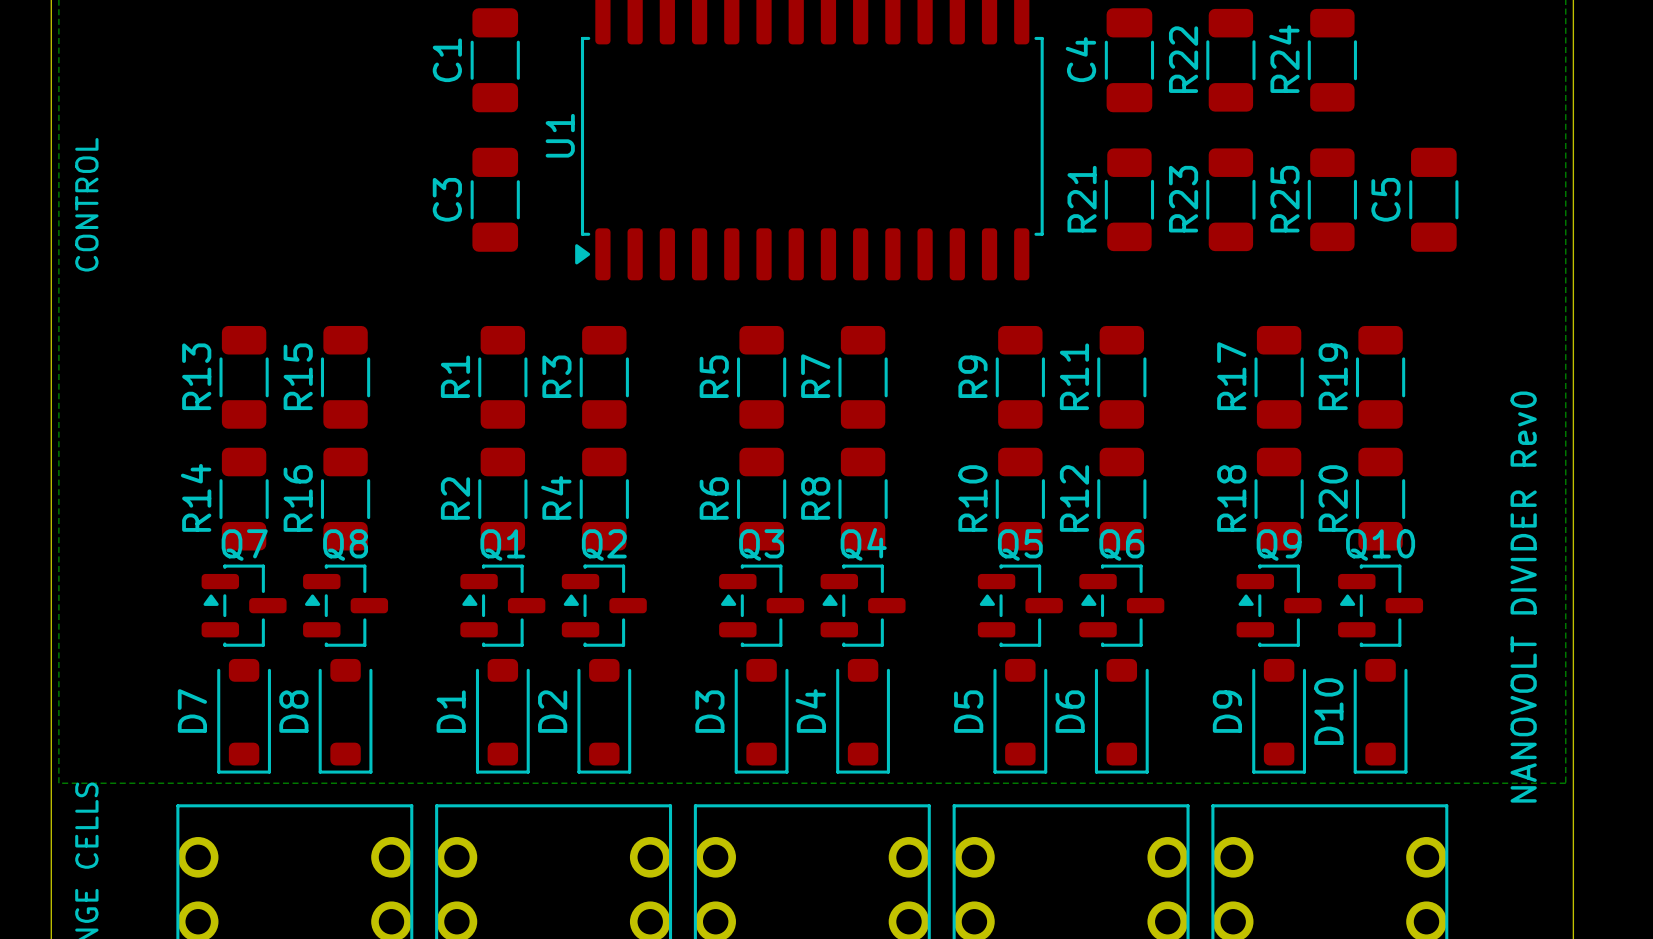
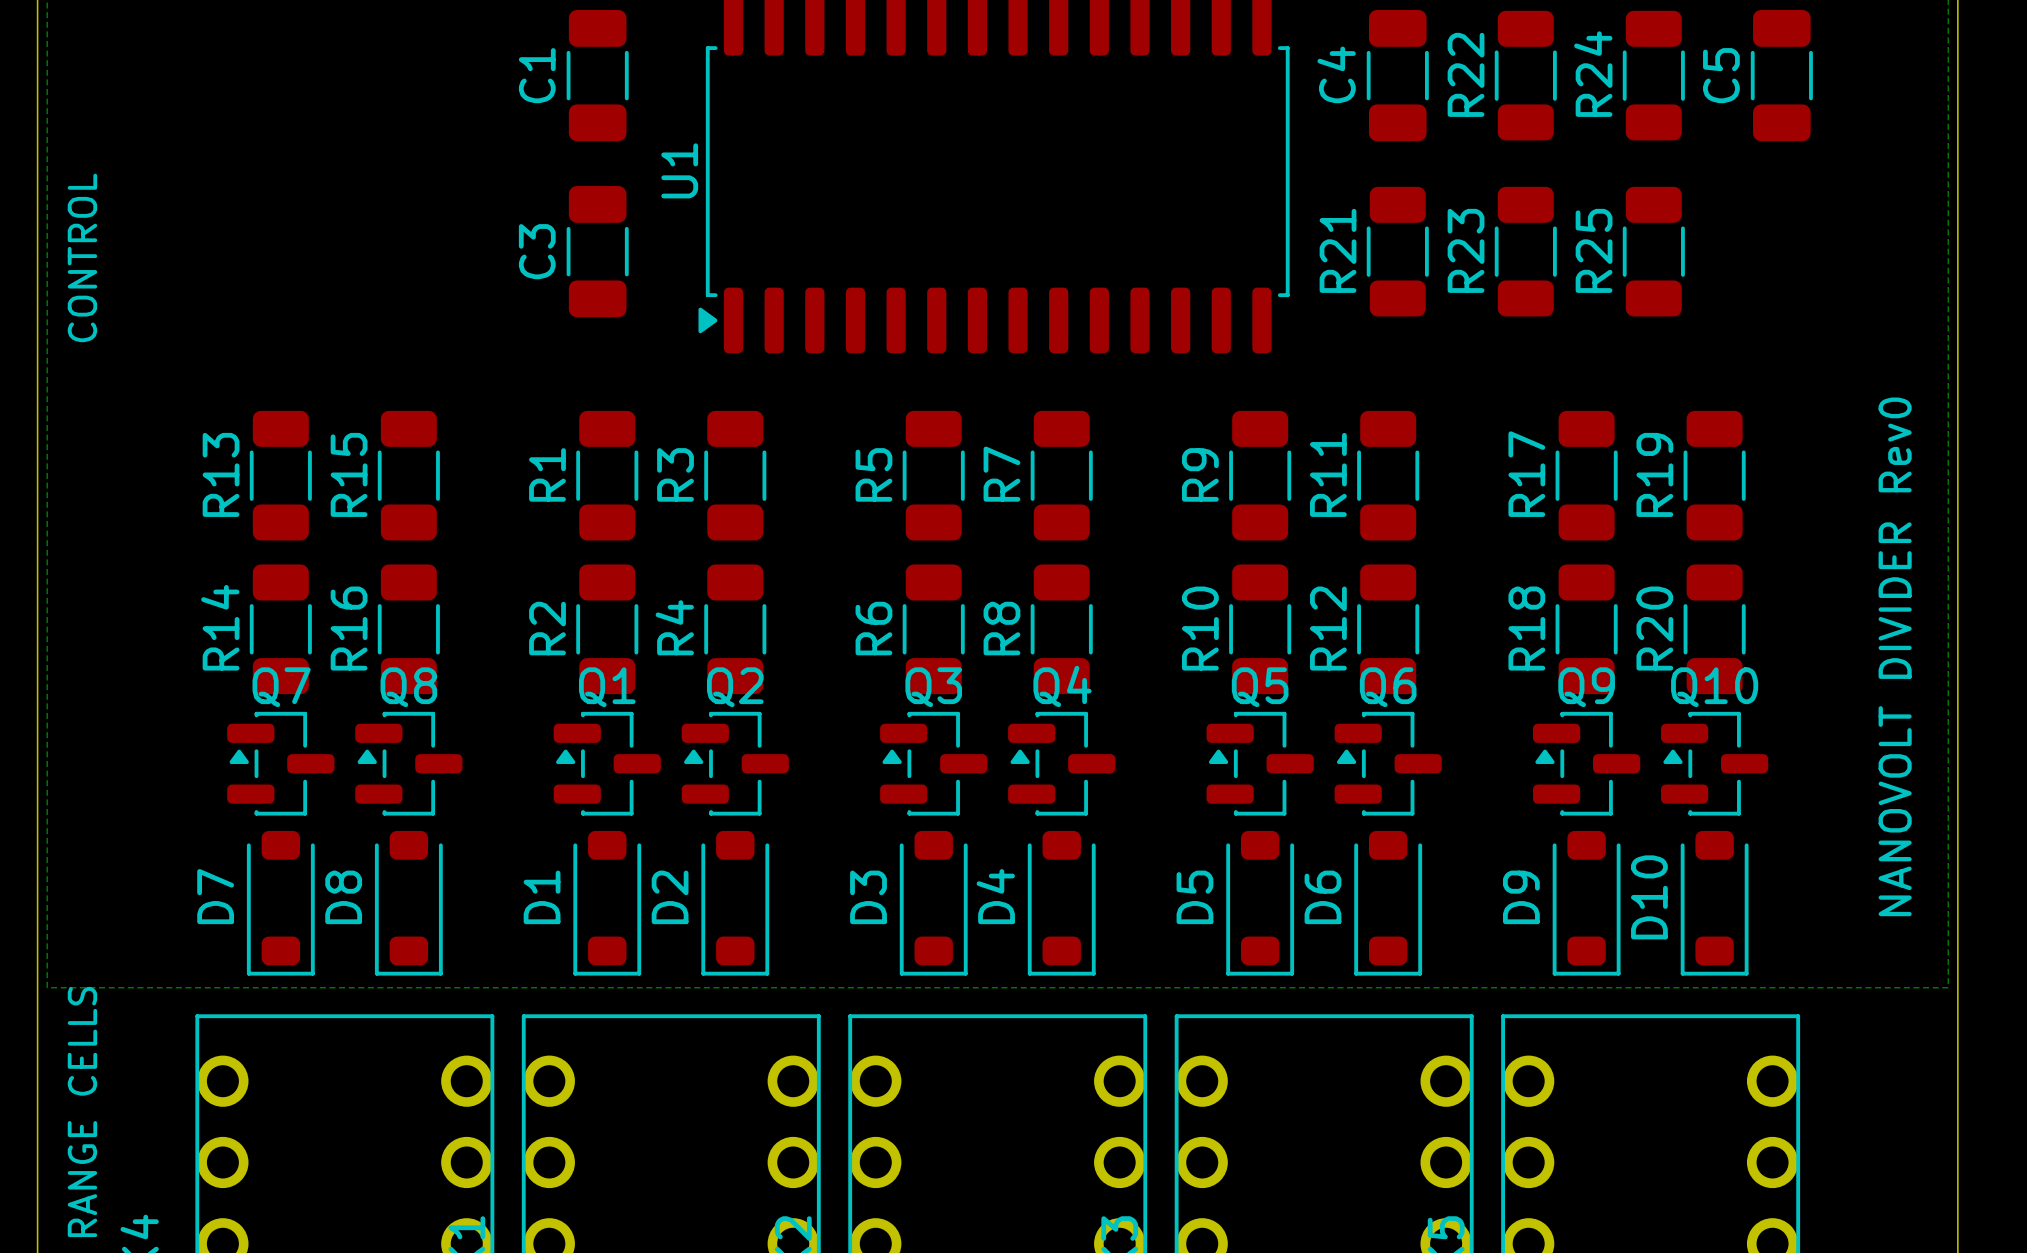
C5 position: (1433, 199) -> (1781, 75)
text position: NANOVOLT DIVIDER Rev0 (1523, 597) -> NANOVOLT DIVIDER Rev0 (1895, 656)

